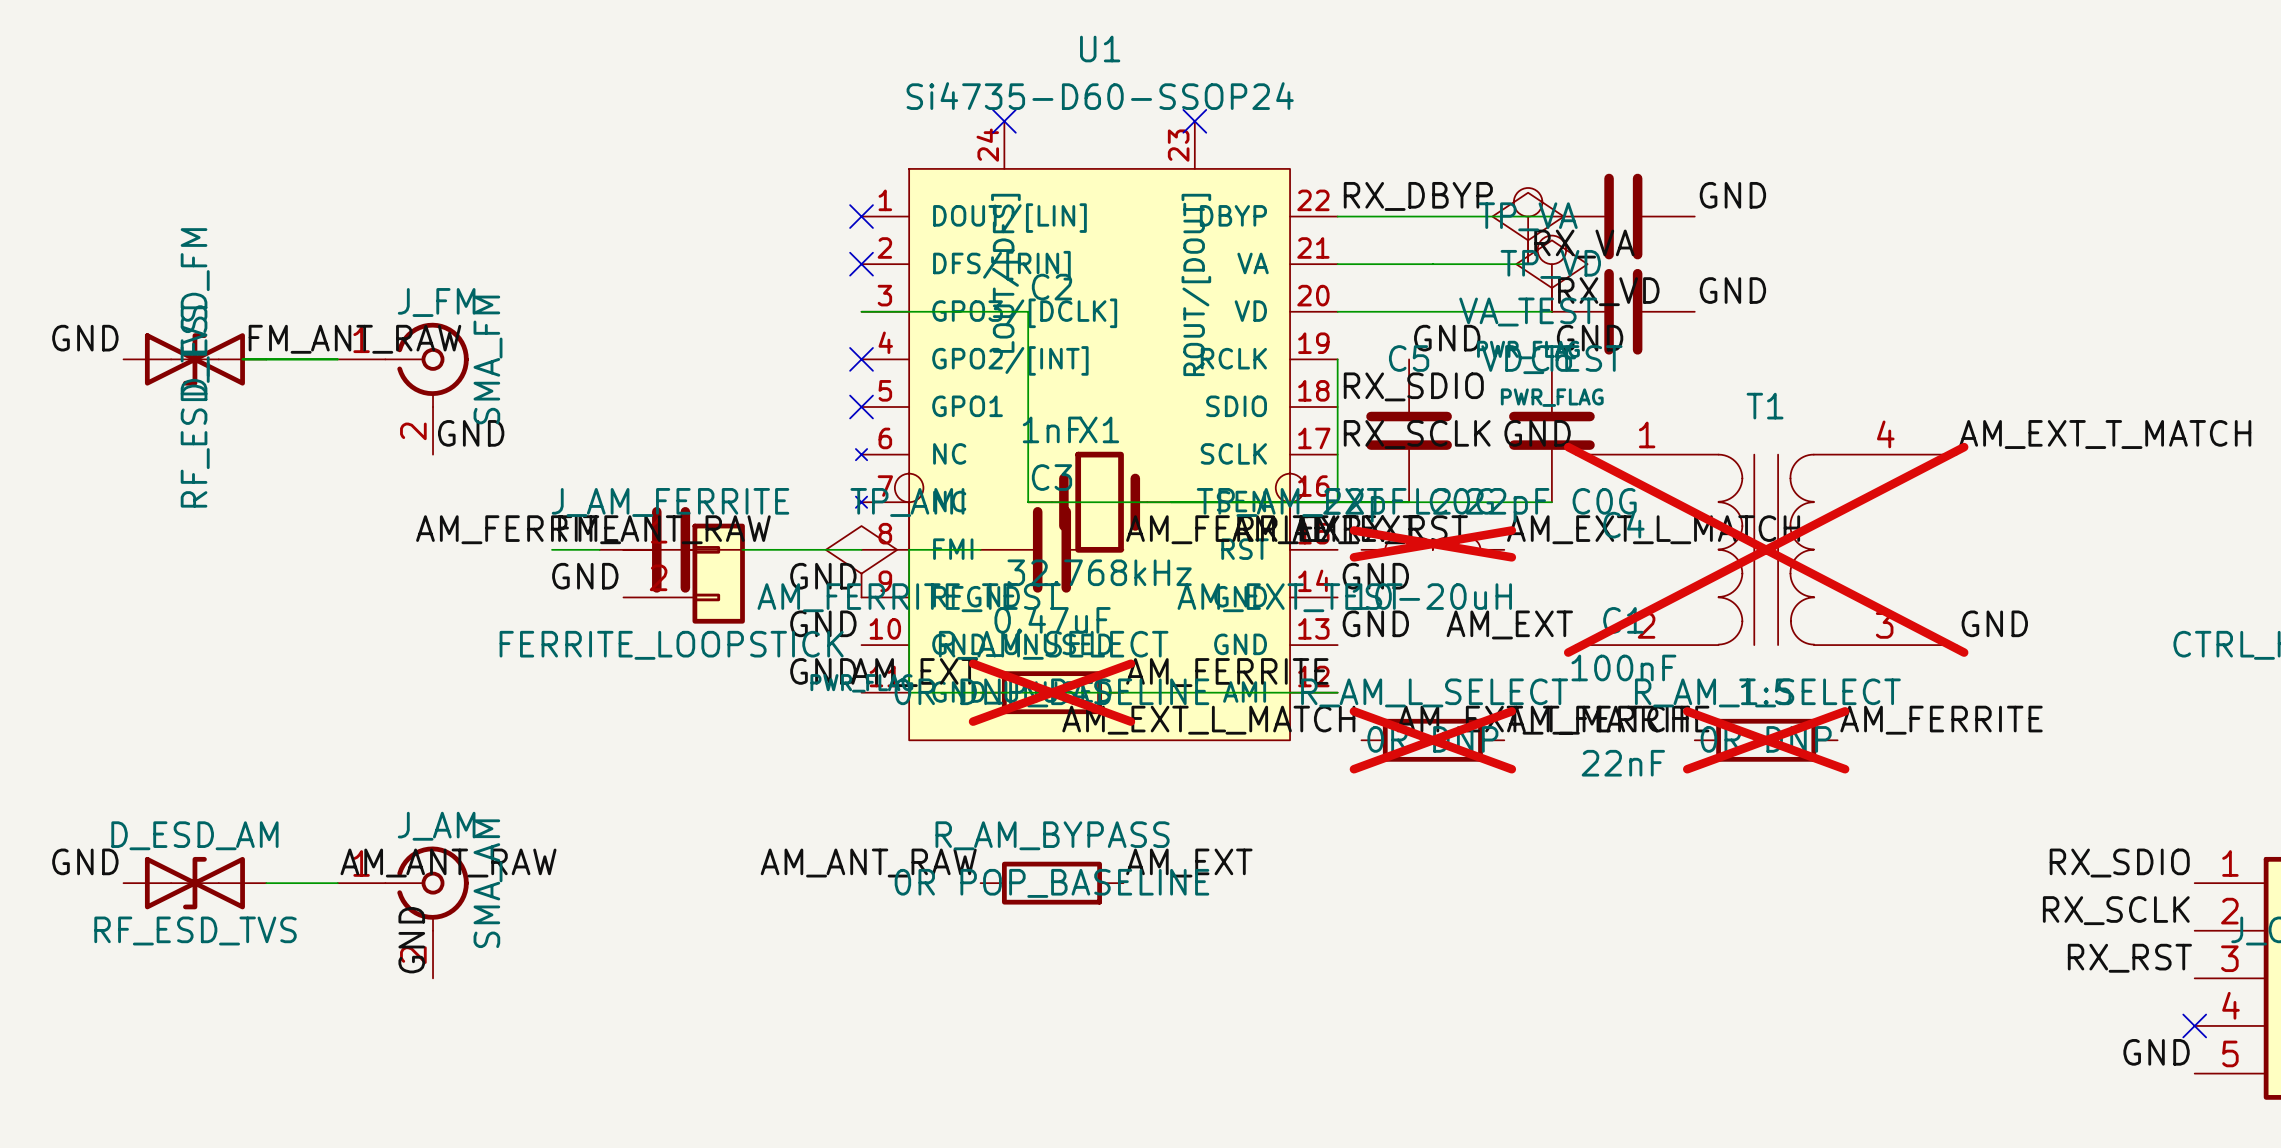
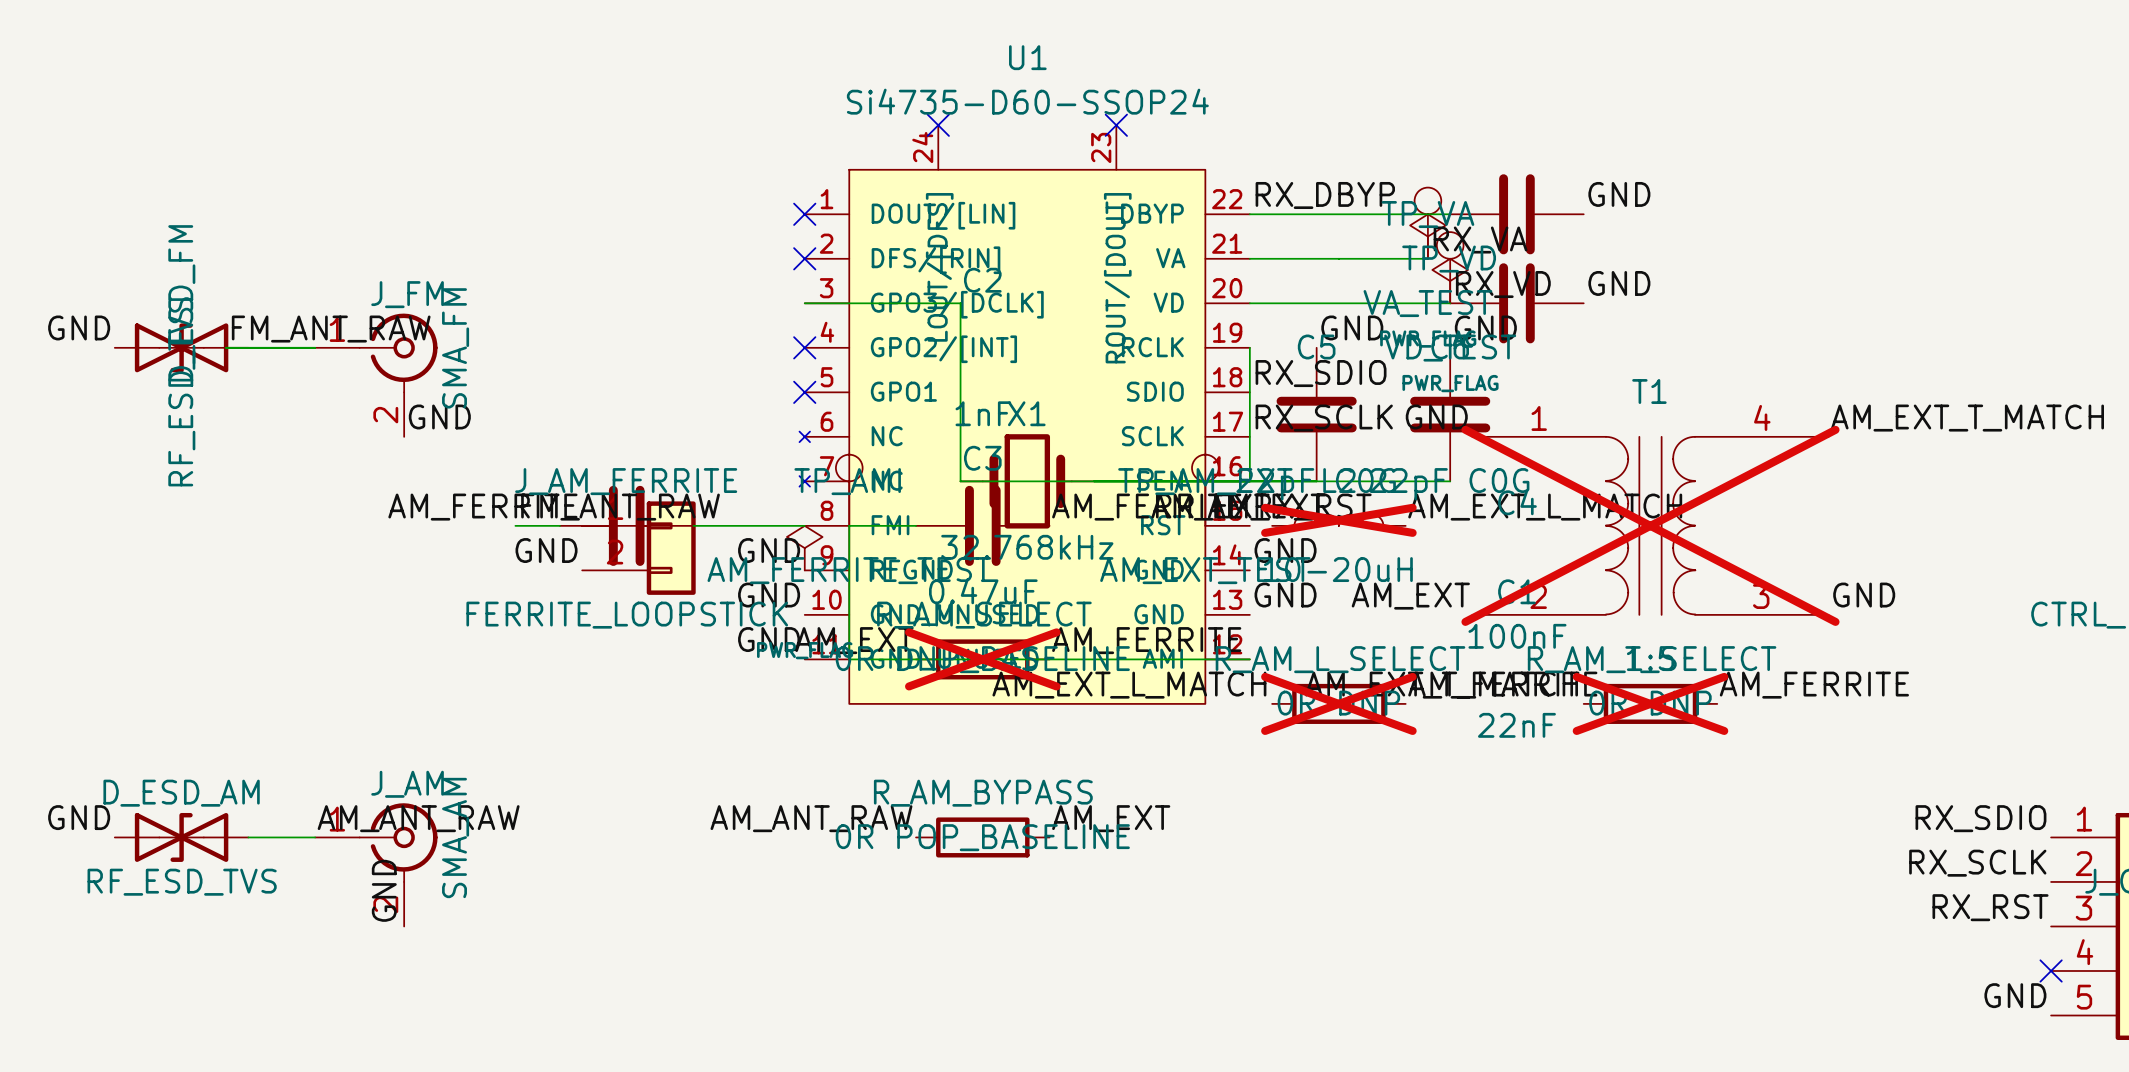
power symbol shape: [1492, 192, 1564, 265] -> [1410, 214, 1446, 259]
power symbol shape: [1516, 240, 1588, 312] -> [1432, 258, 1468, 304]
power symbol shape: [825, 526, 898, 598] -> [786, 525, 823, 571]

